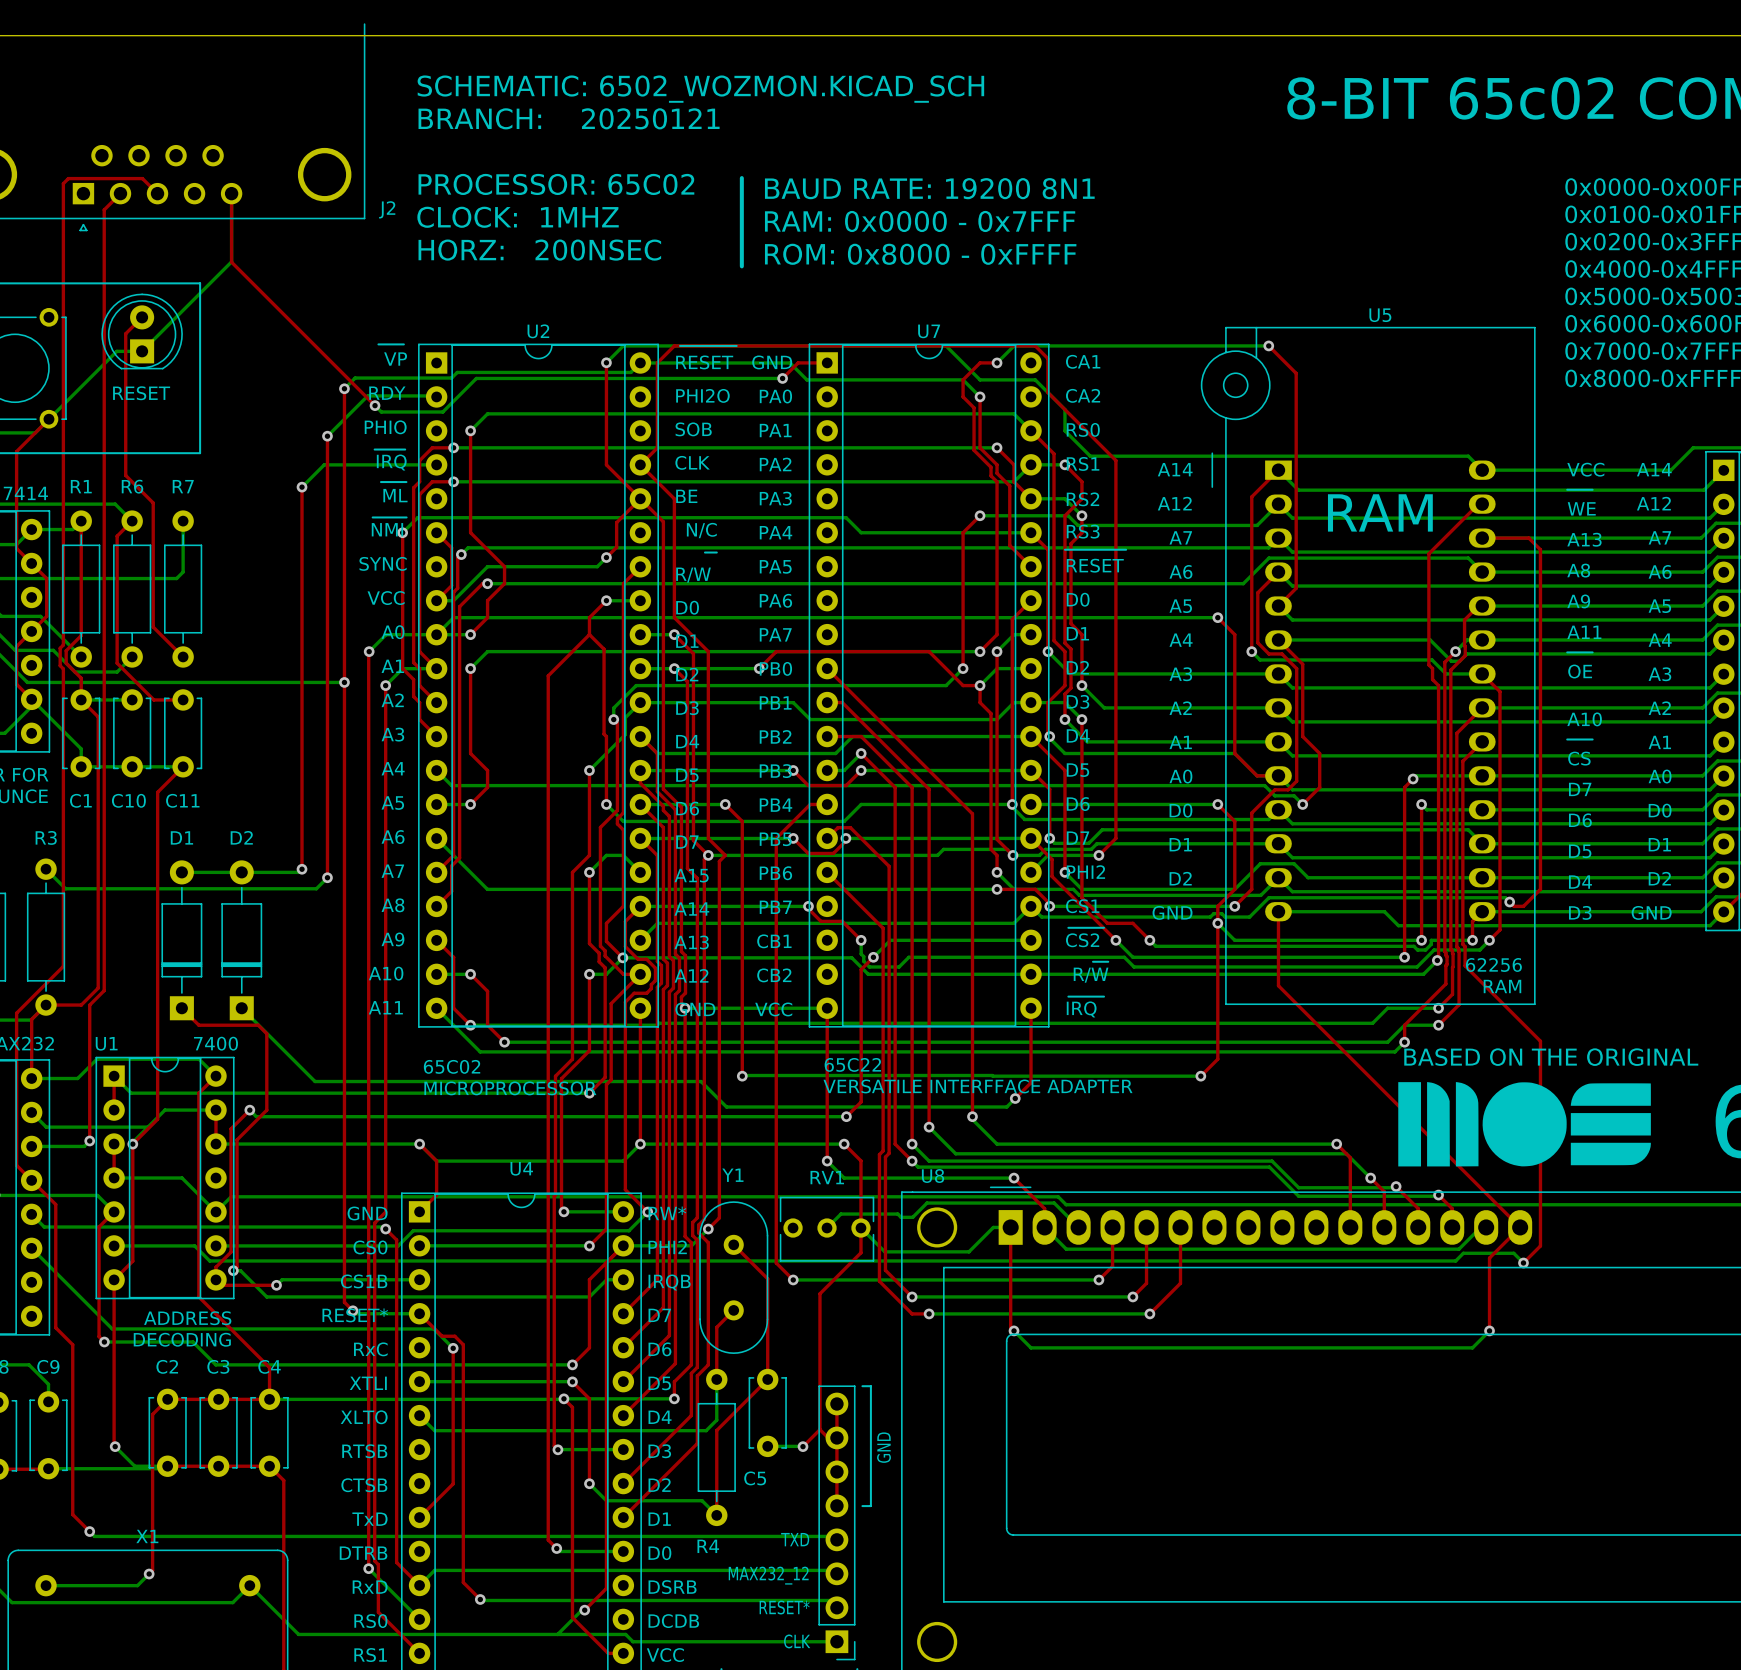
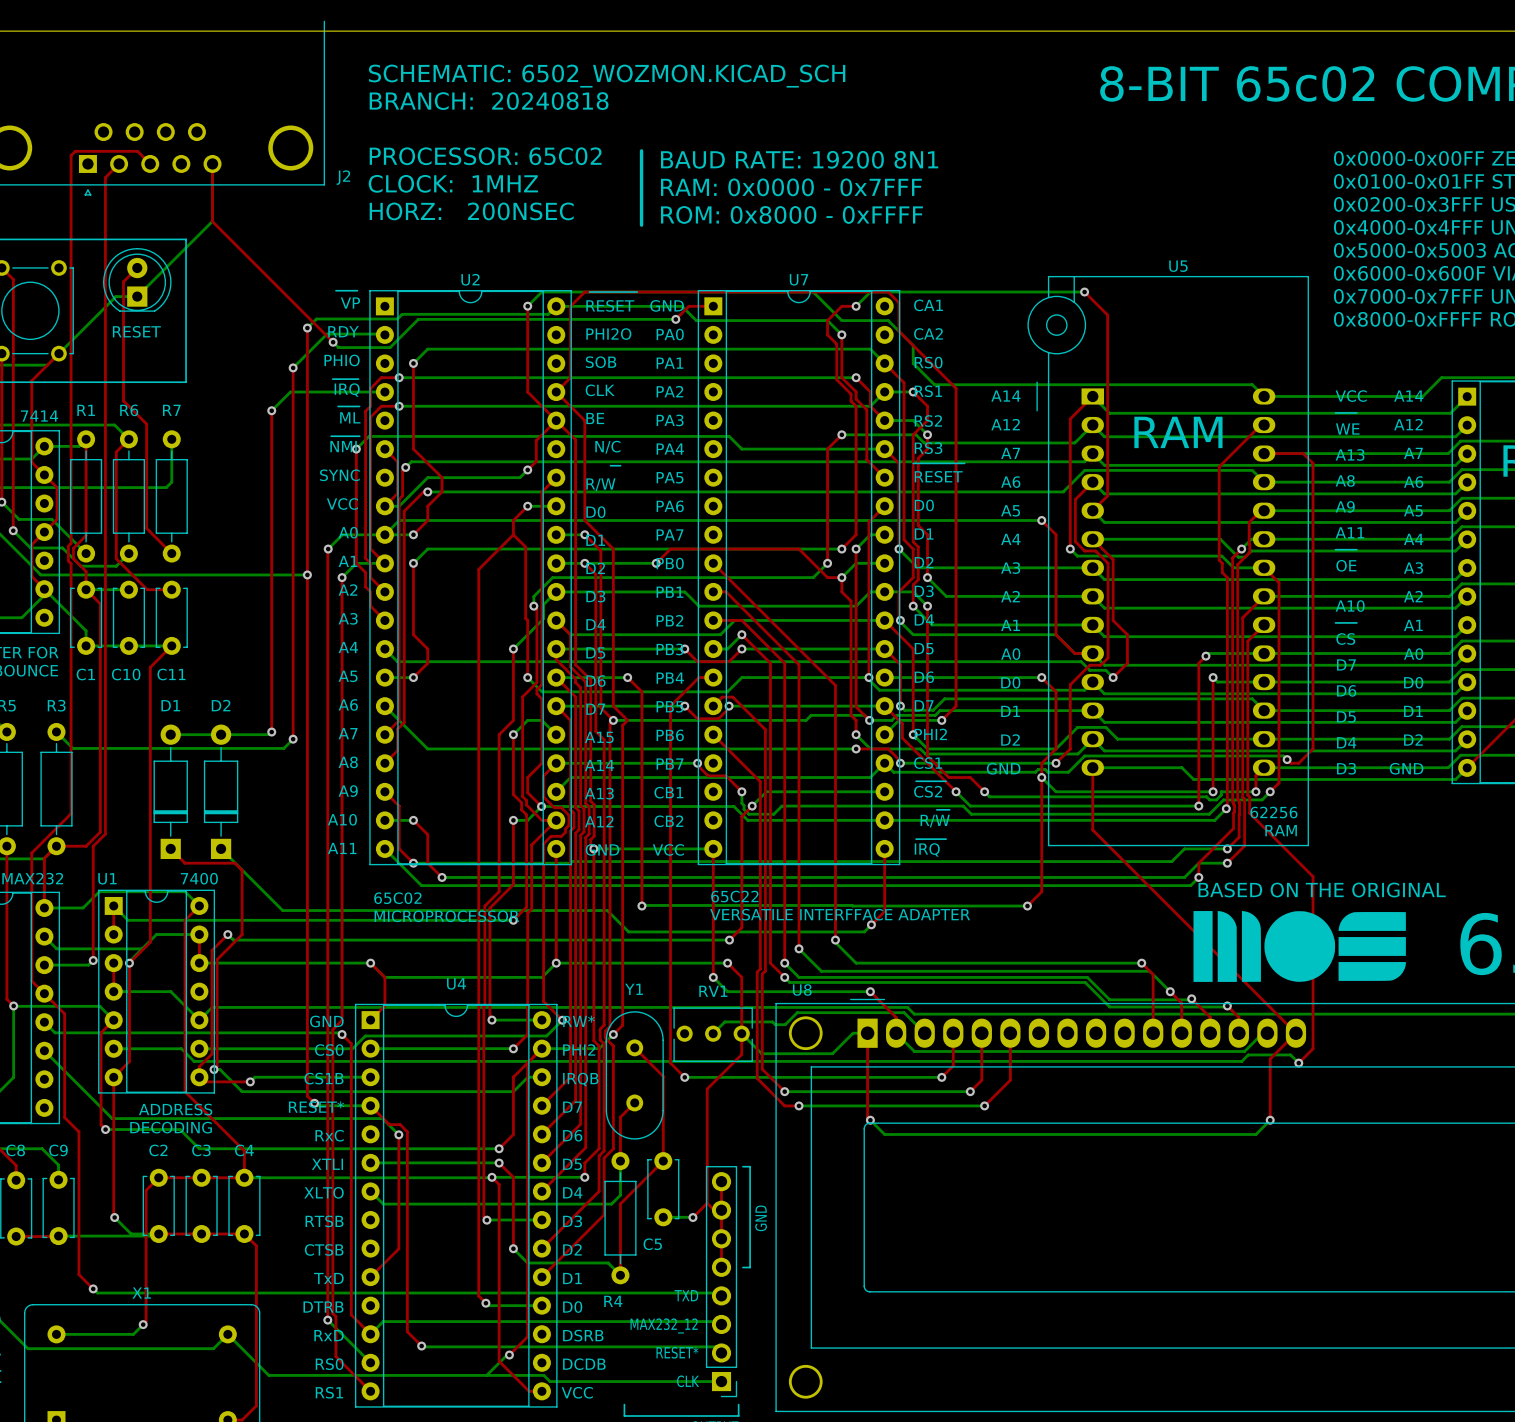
text: BRANCH: 20250121 (569, 118) -> BRANCH: 20240818 (489, 101)

